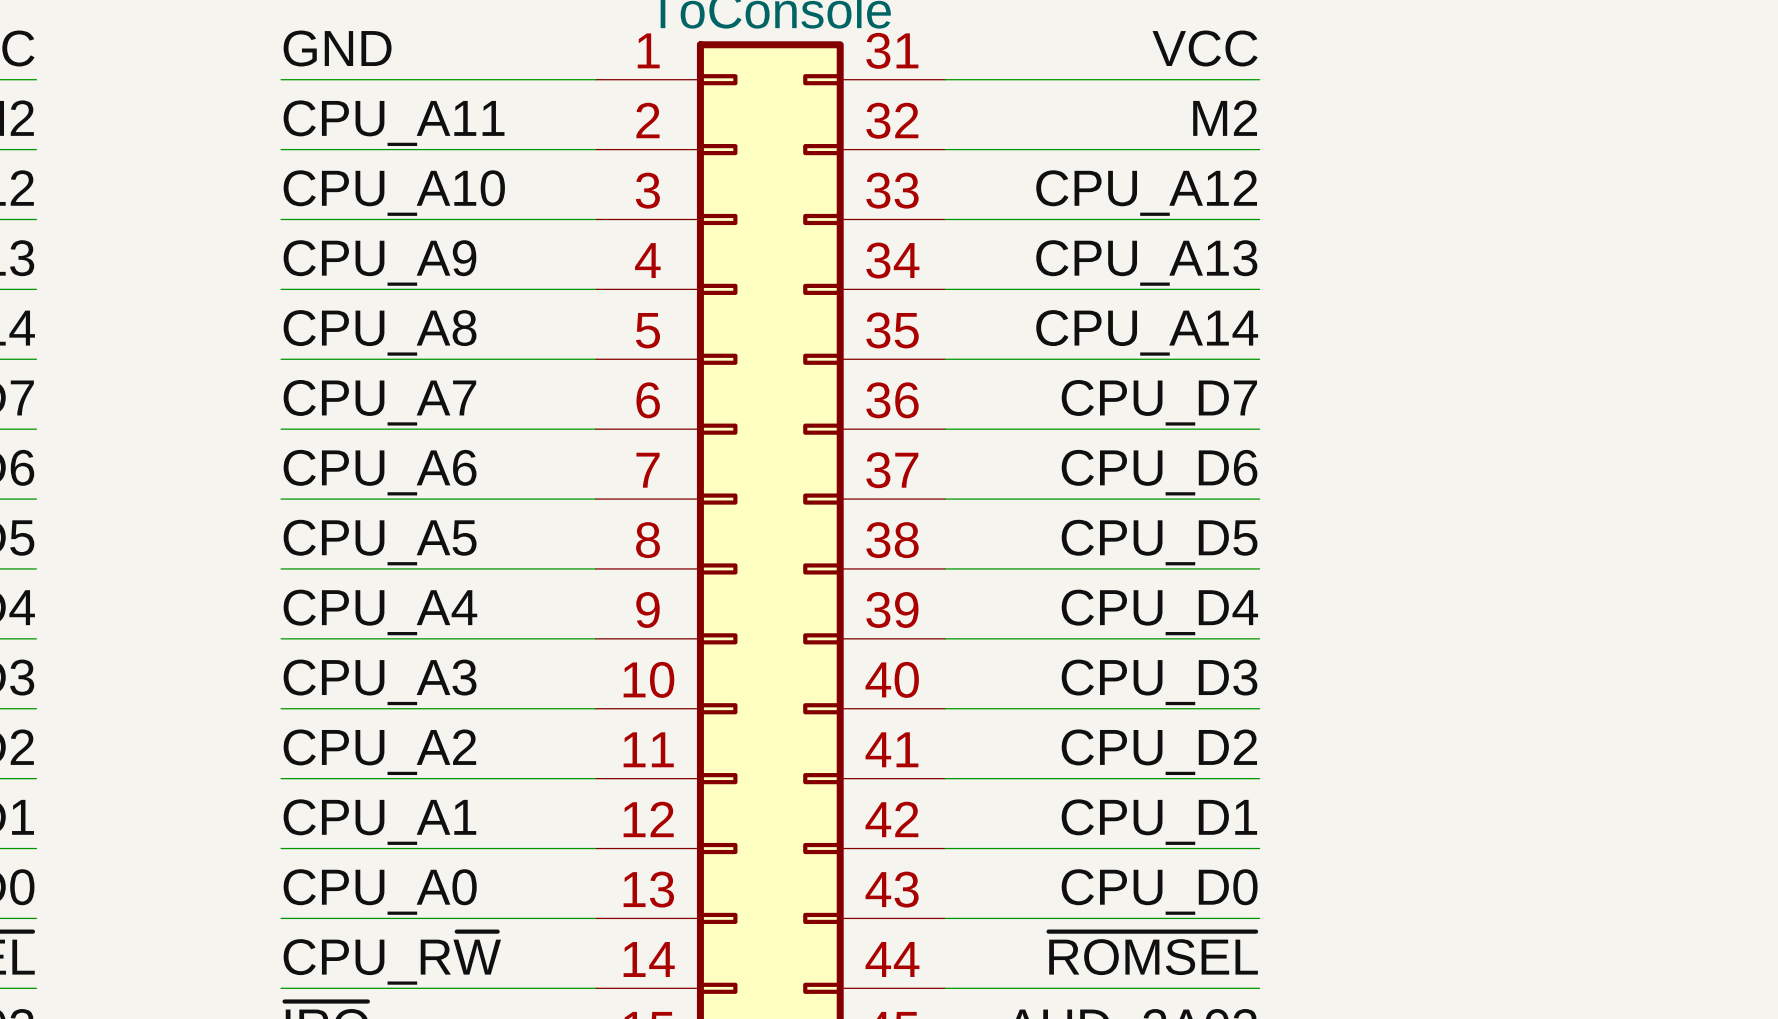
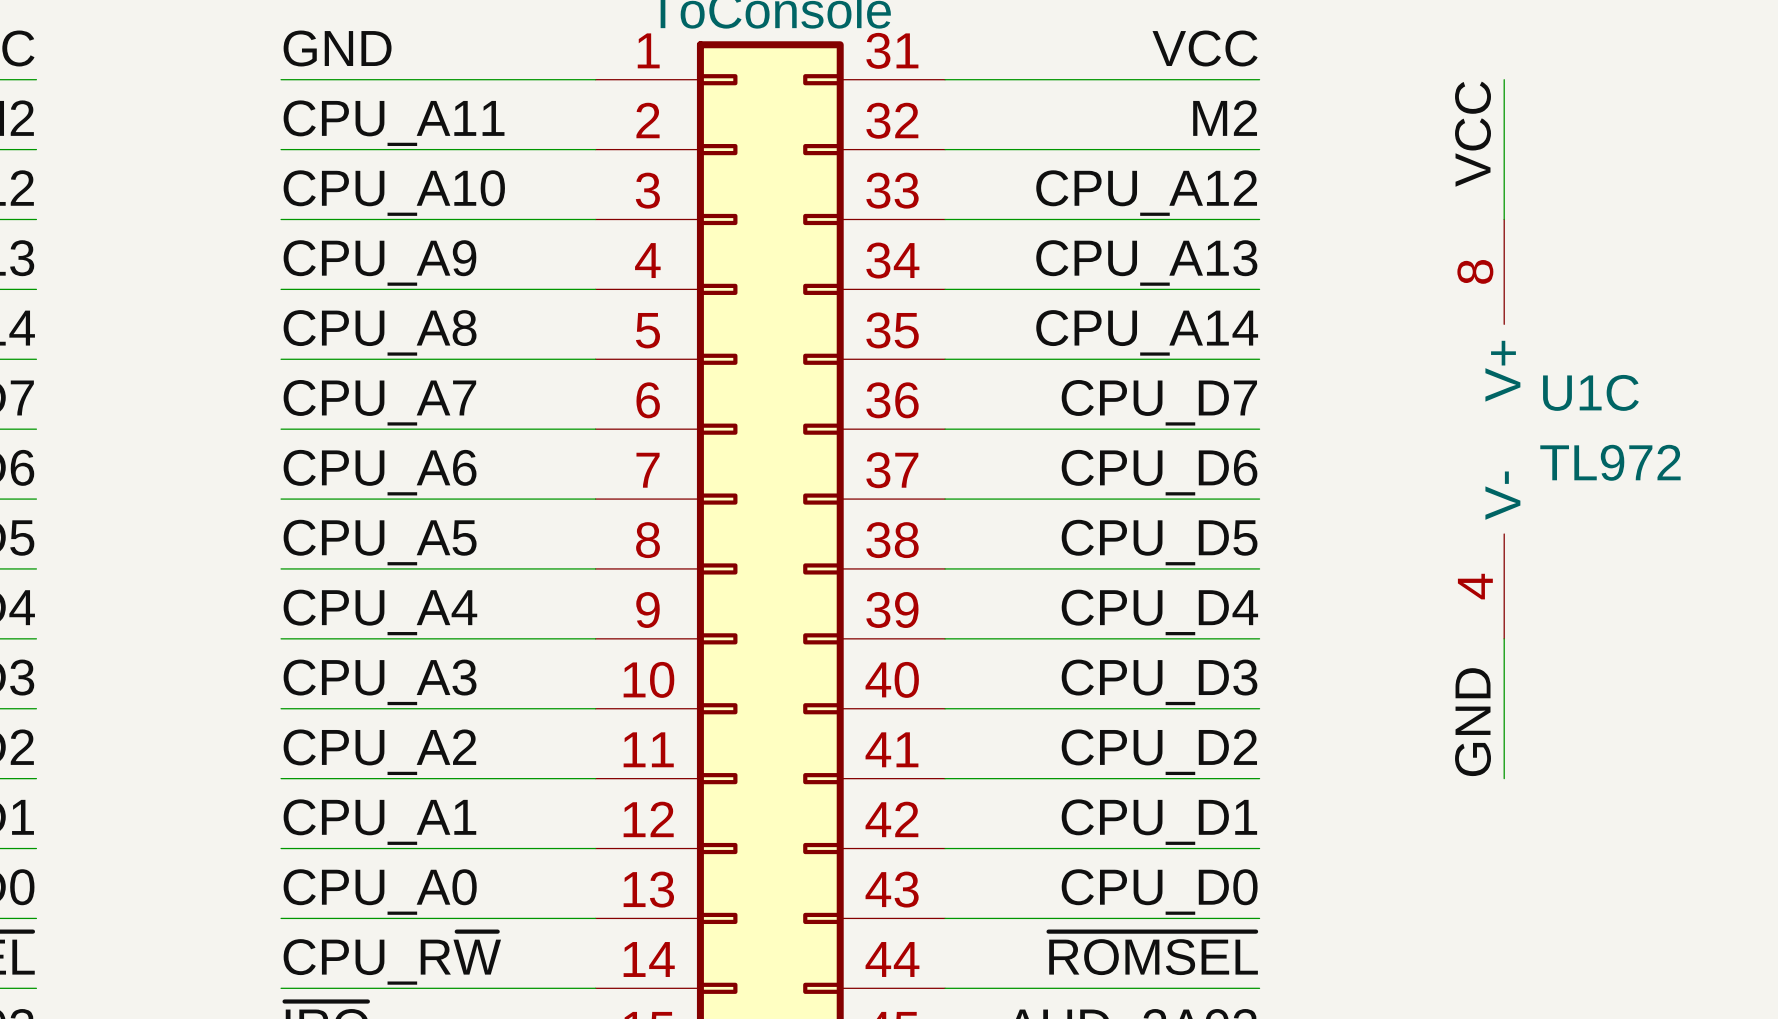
wire: none -> (1504, 79) (1504, 219)
label: none -> VCC (1473, 134)
U1C: none -> TL972 (1504, 429)
wire: none -> (1504, 638) (1504, 778)
label: none -> GND (1473, 722)

